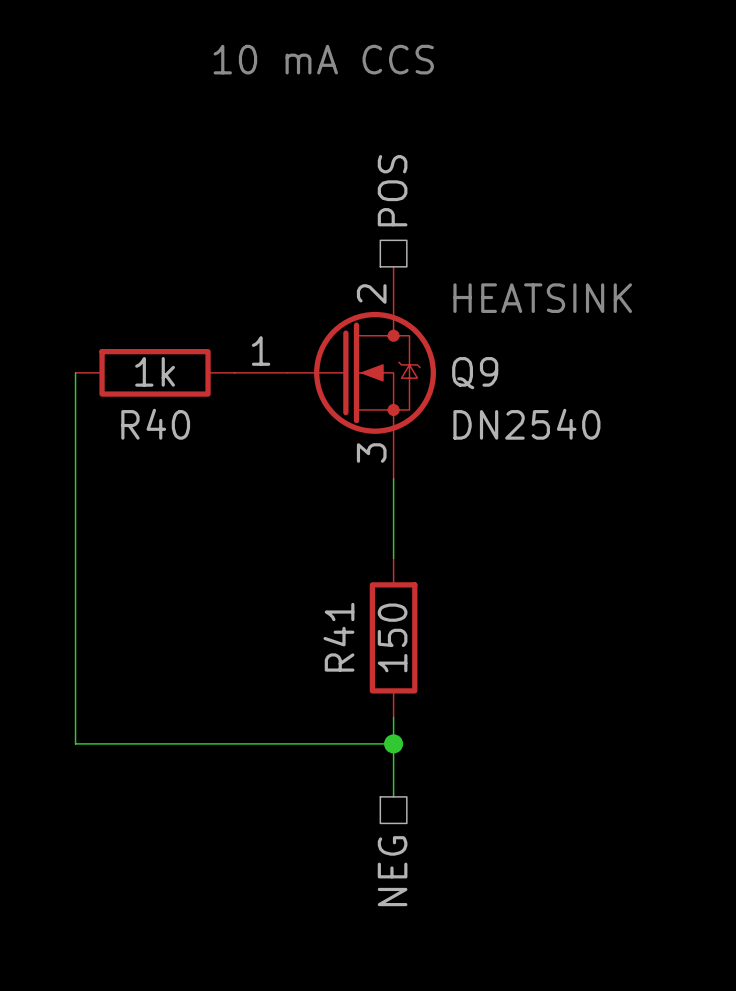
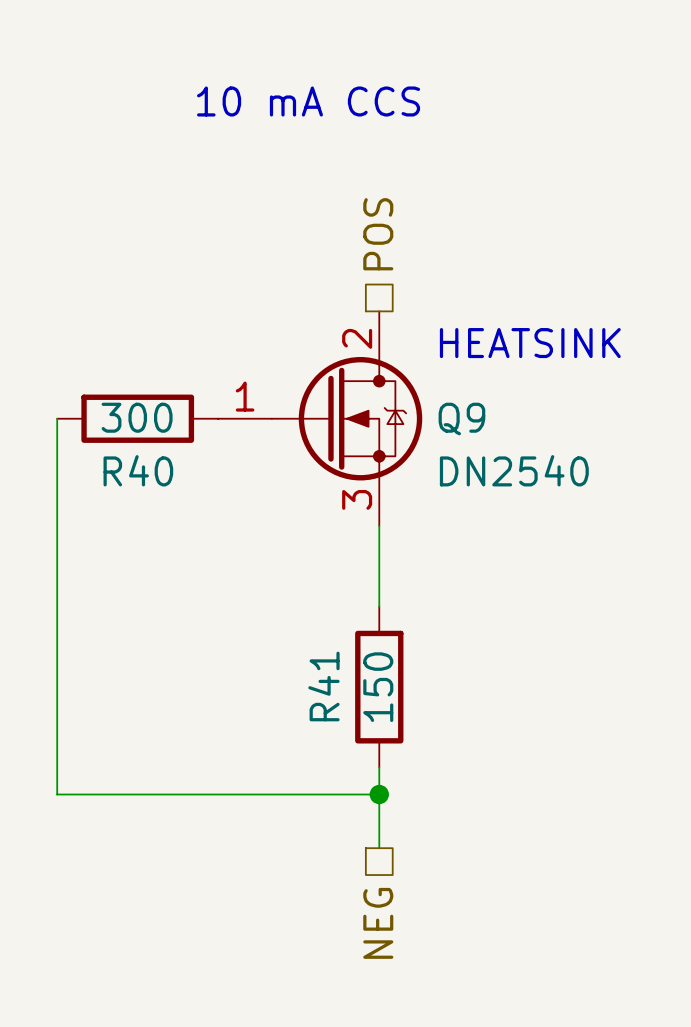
R40 value: 1k (155, 371) -> 300 (137, 417)

